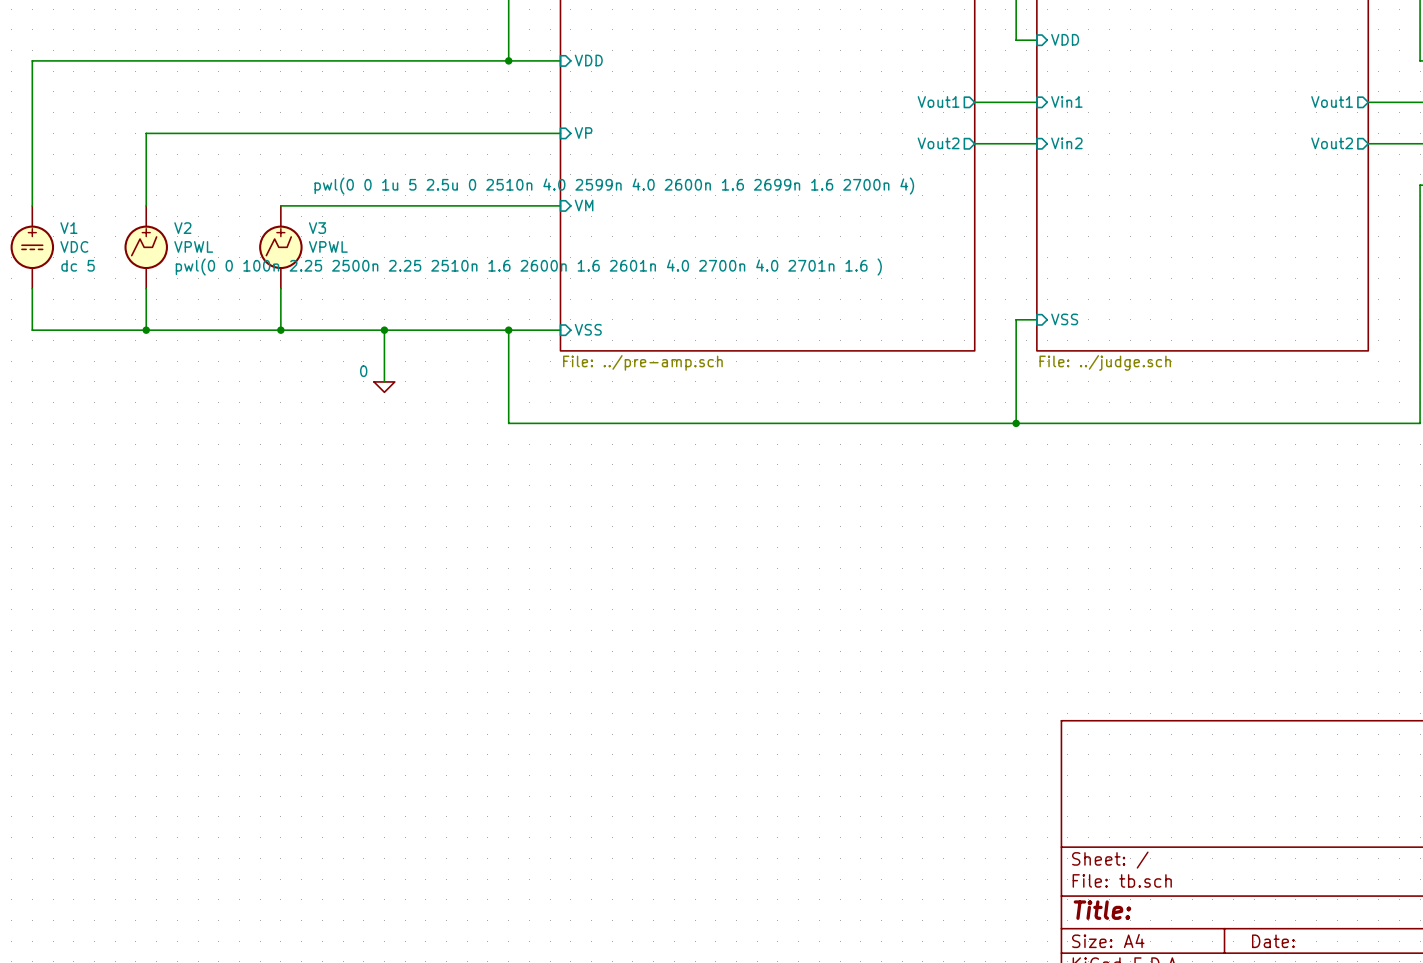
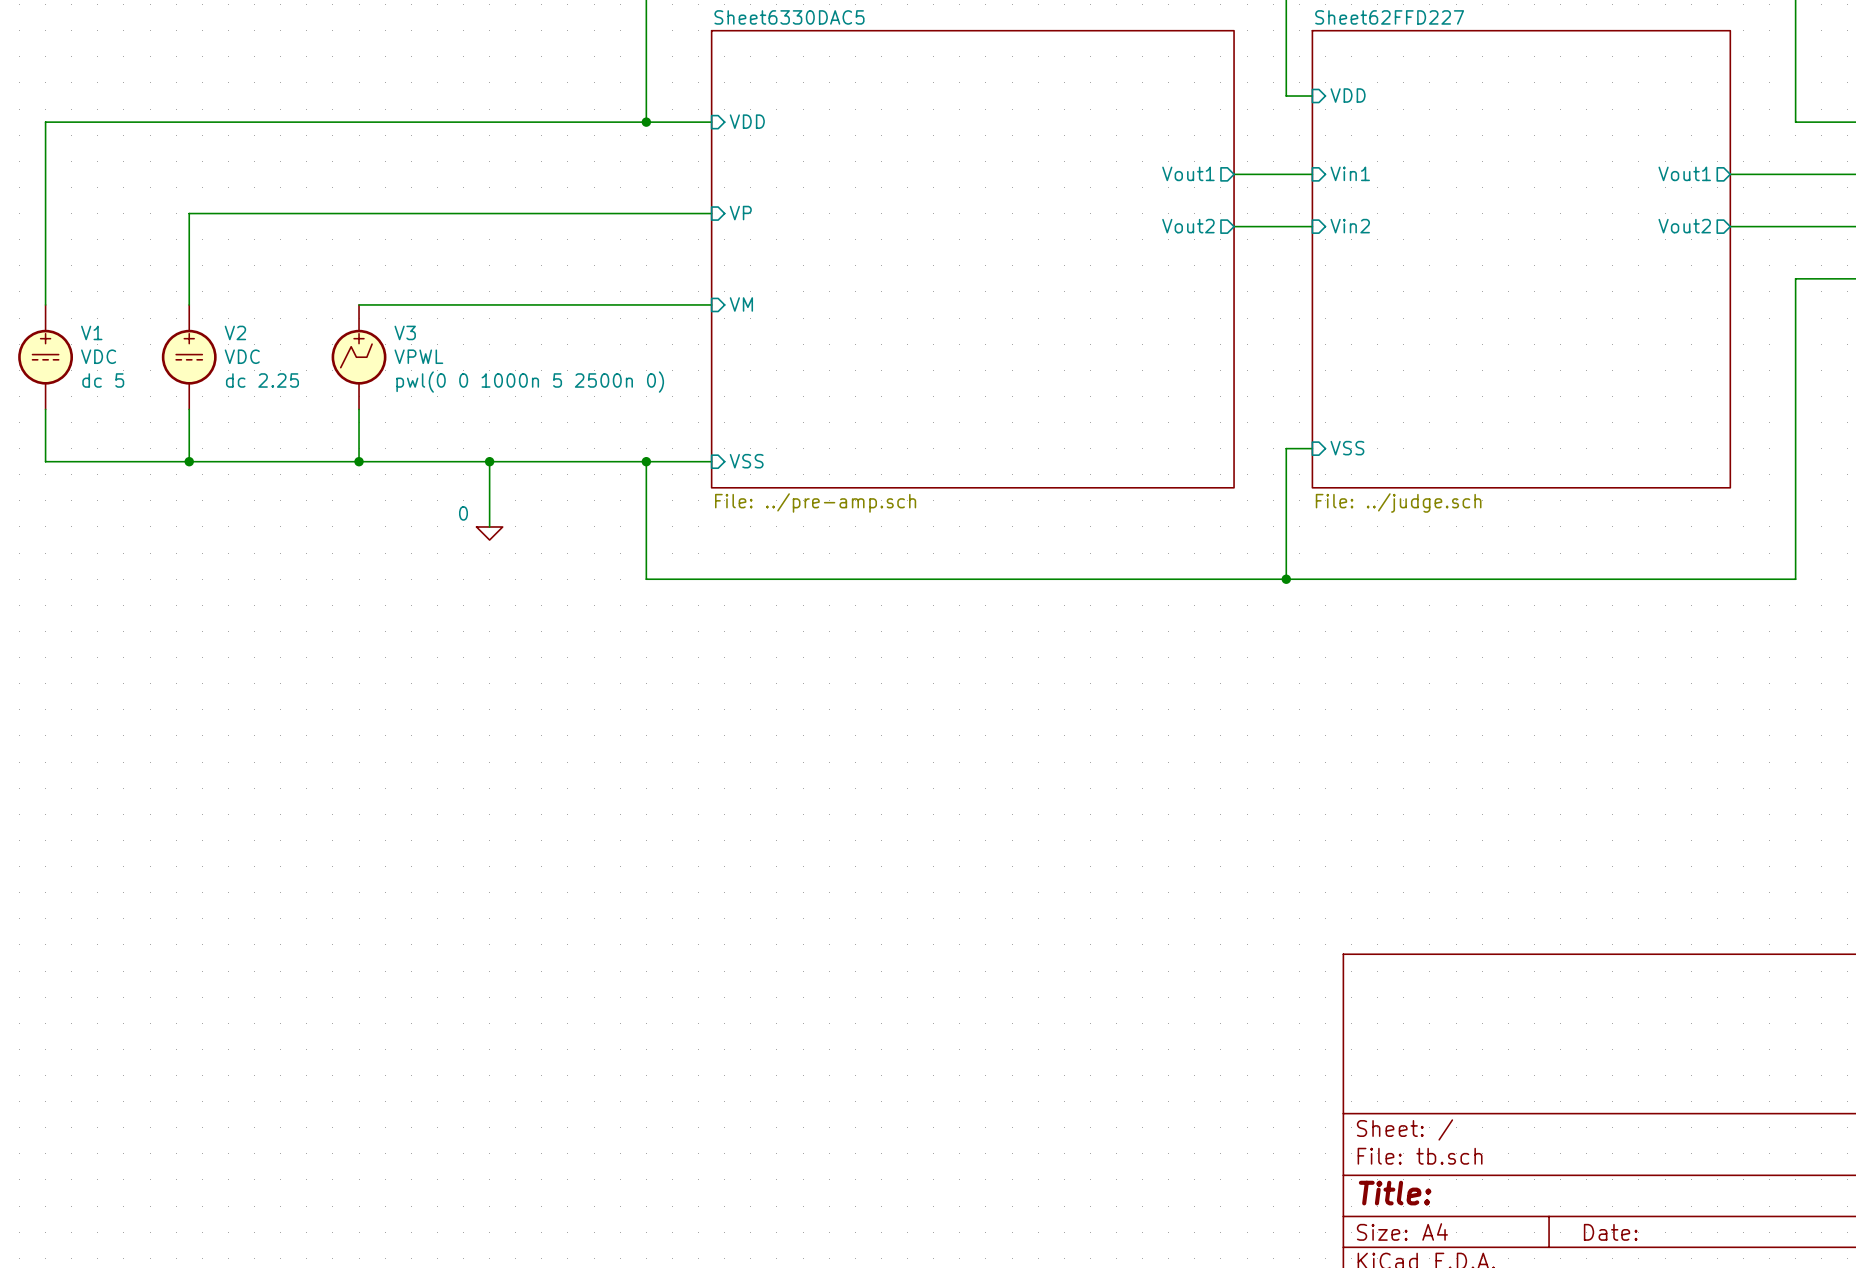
V3 text: pwl(0 0 1u 5 2.5u 0 2510n 4.0 2599n 4.0 2600n 1.6 2699n 1.6 2700n 4) (614, 186) -> pwl(0 0 1000n 5 2500n 0) (530, 382)
V2 symbol: [124, 205, 168, 289] -> [161, 304, 217, 410]
V2 value: VPWL (193, 246) -> VDC (242, 356)
V2 text: pwl(0 0 100n 2.25 2500n 2.25 2510n 1.6 2600n 1.6 2601n 4.0 2700n 4.0 2701n 1.6 ) (528, 267) -> dc 2.25 (262, 380)

